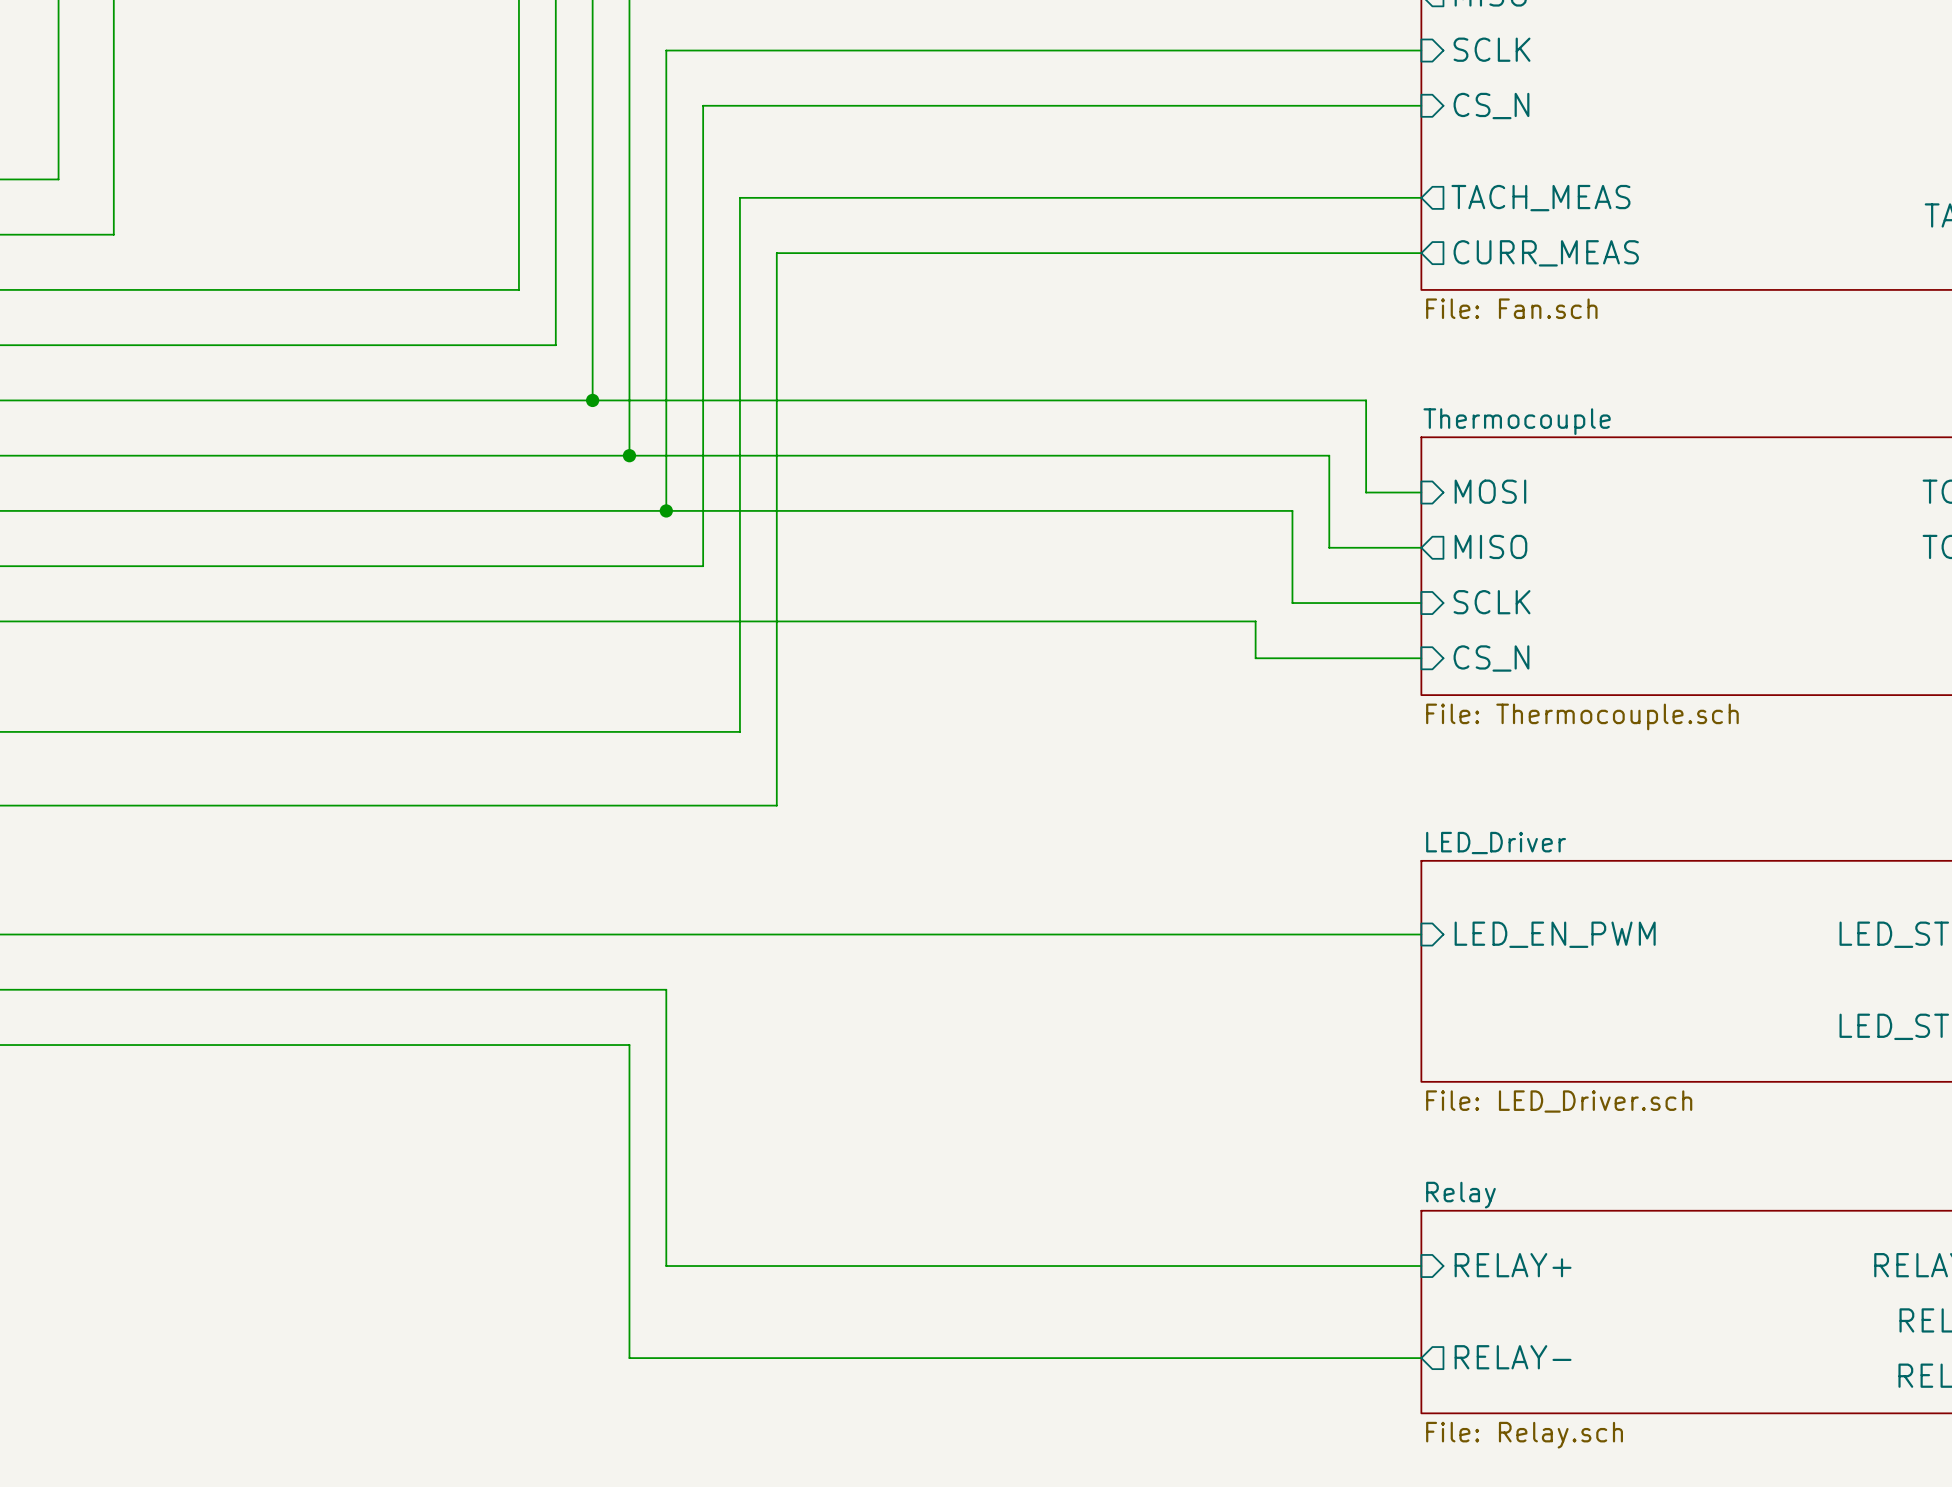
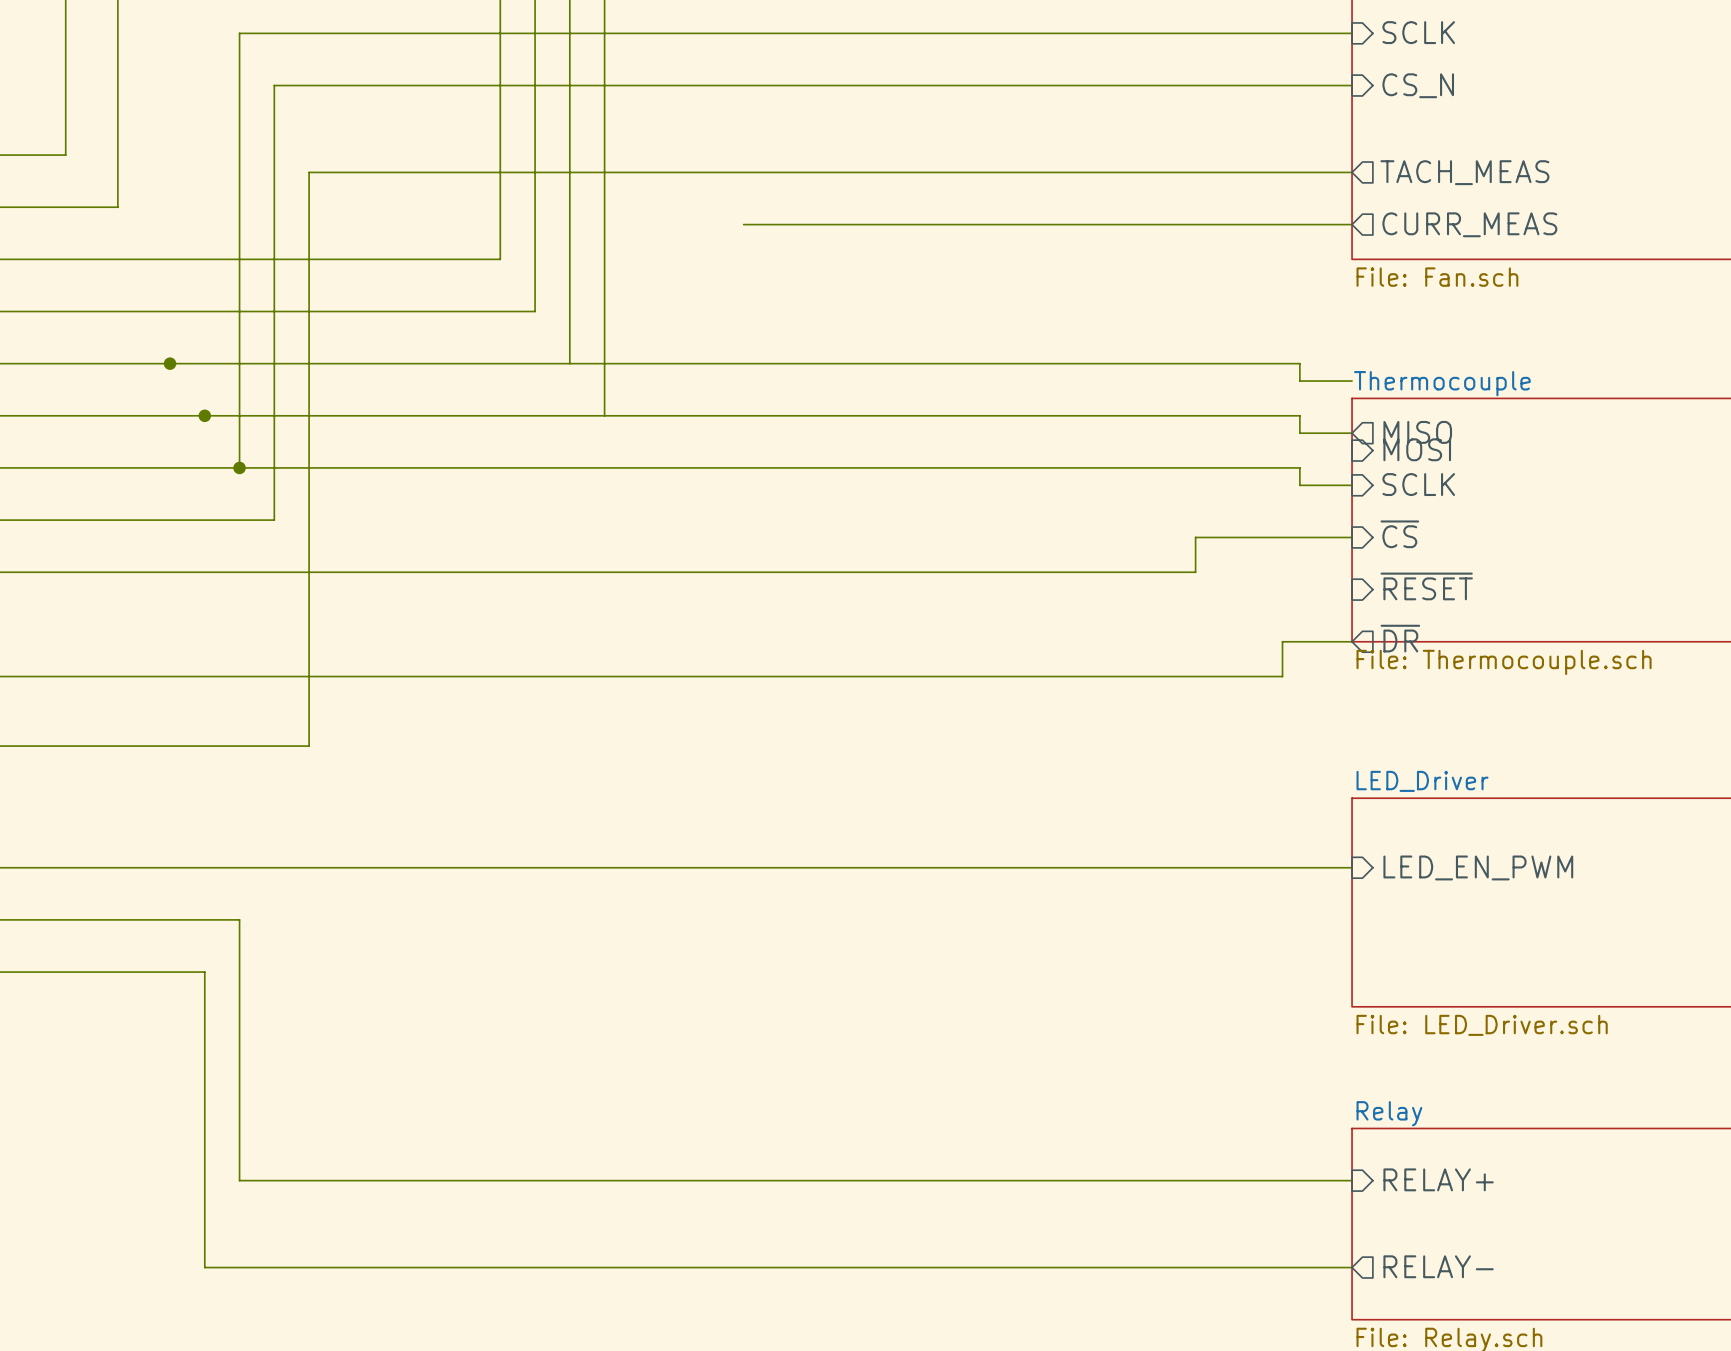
wire: (666, 50) (666, 510) -> (639, 33) (239, 33) (239, 467)
wire: (703, 105) (703, 566) (279, 566) -> (674, 85) (274, 85) (274, 520)
wire: (739, 197) (739, 731) -> (1352, 641) (1282, 641) (1282, 676) (708, 676)
wire: (776, 253) (776, 805) (316, 805) -> (708, 172) (309, 172) (309, 746)
junction: none -> (170, 363)
junction: (592, 400) -> none
wire: (1366, 418) (1366, 455) -> (1265, 415) (1299, 415)
wire: none -> (1299, 381) (1352, 381)
junction: none -> (204, 415)
junction: (629, 455) -> none
wire: (1329, 455) (1329, 547) (1421, 547) -> none
wire: (1366, 474) (1366, 492) (1421, 492) -> (1299, 433) (1352, 433)
junction: none -> (239, 467)
junction: (666, 510) -> none
wire: (1292, 510) (1292, 603) (1421, 603) -> (1230, 467) (1299, 467) (1299, 485) (1352, 485)
sheet pin position: MISO (1490, 546) -> MISO (1417, 432)
sheet pin: none -> ~{CS} (1399, 534)
sheet pin position: SCLK (1492, 602) -> SCLK (1418, 484)
wire: (1255, 621) (1255, 658) (1421, 658) -> (1195, 572) (1195, 537) (1352, 537)
sheet pin: none -> ~{RESET} (1426, 586)
sheet pin: CS_N (1491, 658) -> none
sheet pin: none -> ~{DR} (1400, 638)
wire: (242, 989) (666, 989) (666, 1266) -> (239, 919) (239, 1180) (639, 1180)
wire: (205, 1045) (629, 1045) (629, 1358) -> (204, 972) (204, 1267) (604, 1267)

